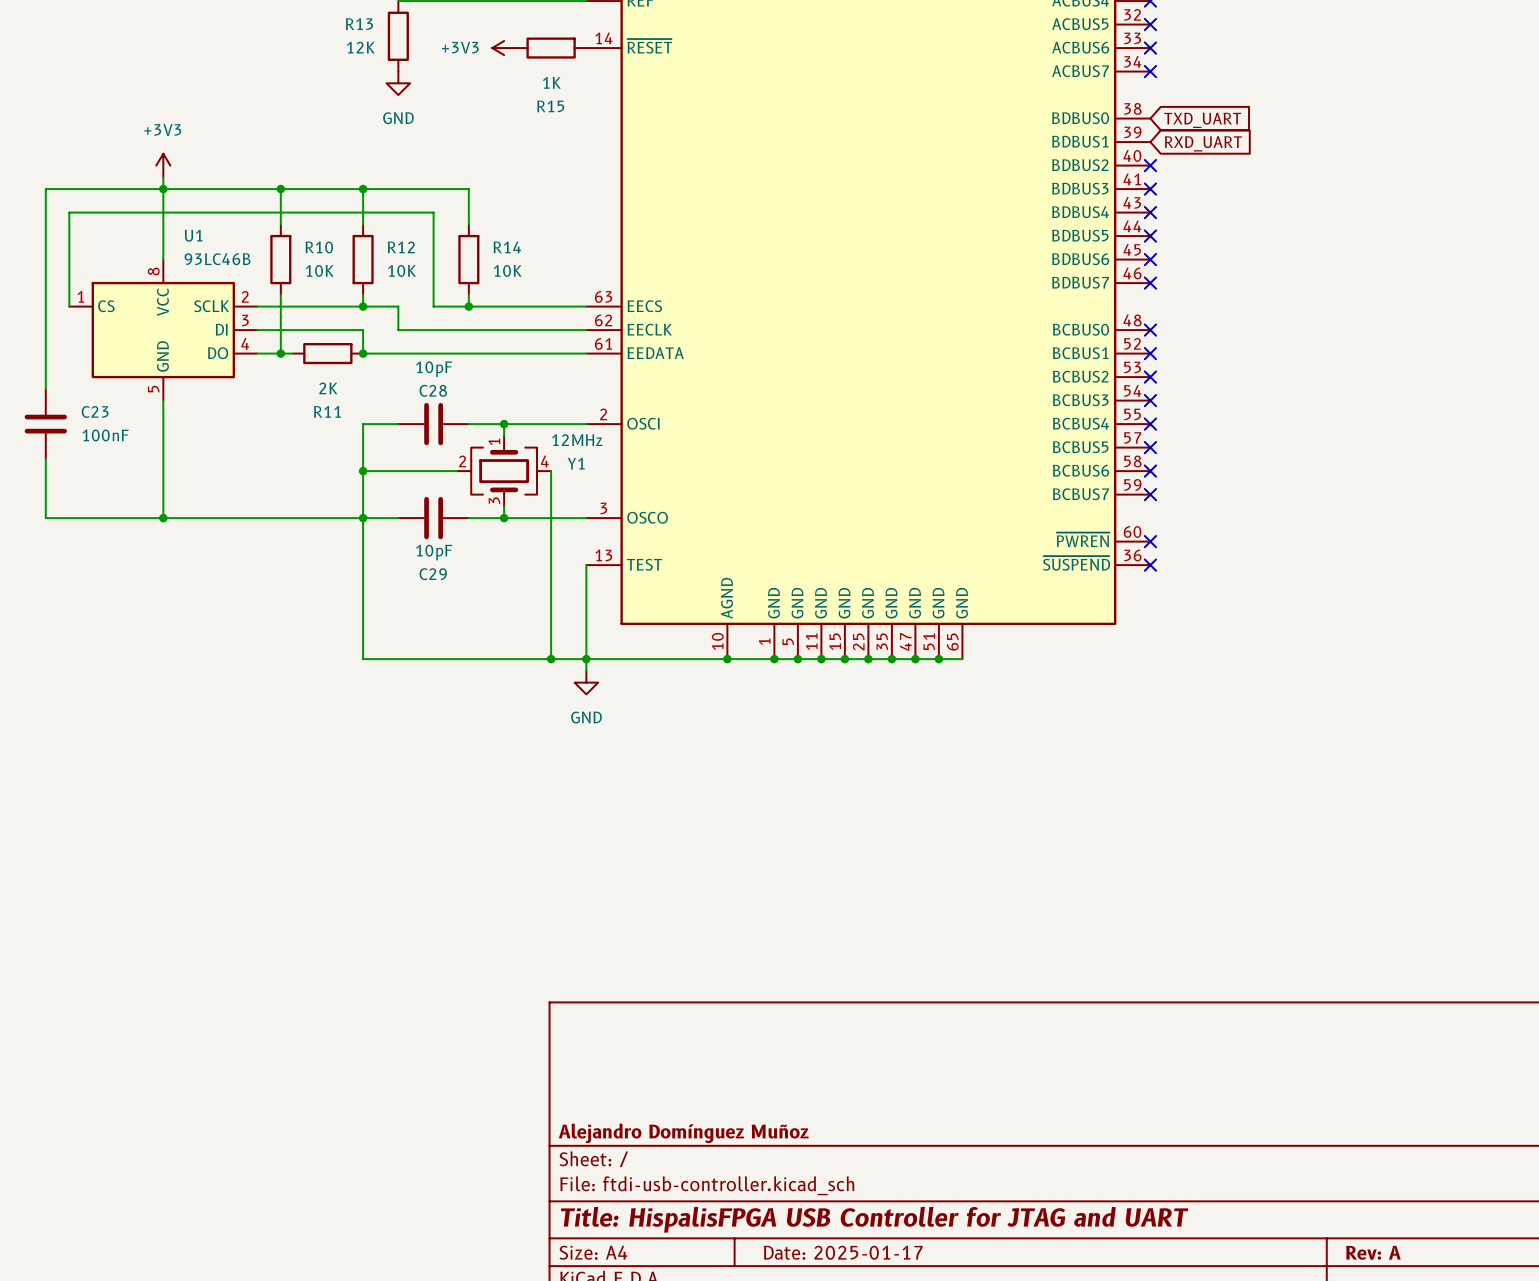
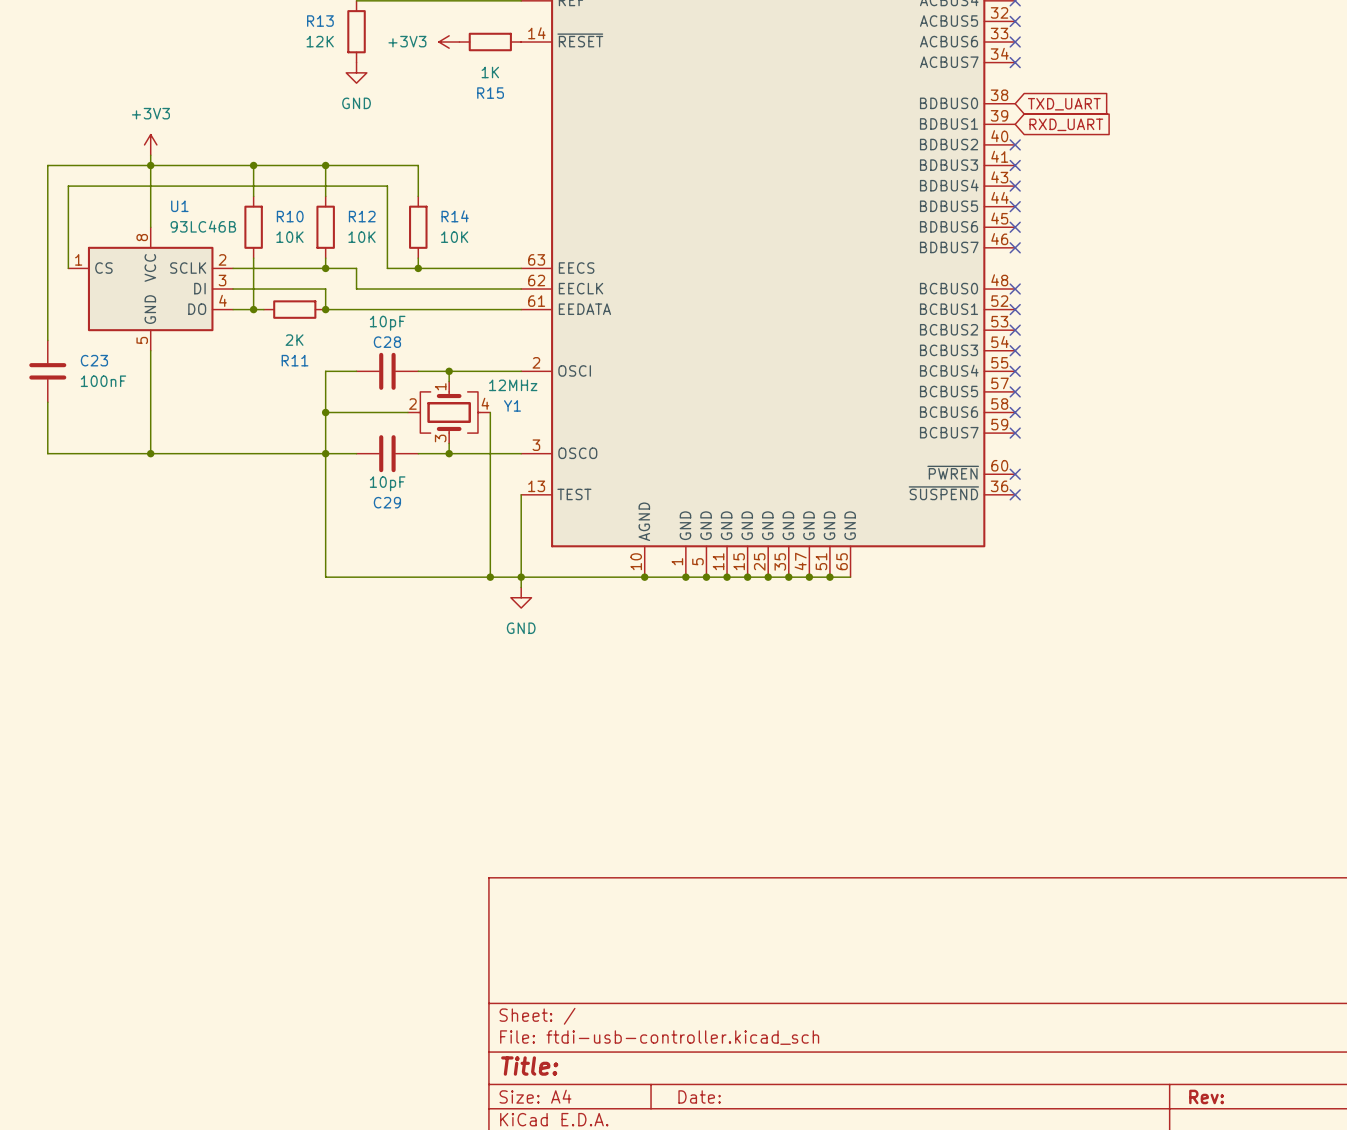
title block: Alejandro Domínguez Muñoz (683, 1133) -> none
title block: Title: HispalisFPGA USB Controller for JTAG and UART (874, 1219) -> Title: (529, 1066)
title block: Date: 2025-01-17 (843, 1252) -> Date: (699, 1096)
title block: Rev: A (1373, 1252) -> Rev: (1206, 1096)

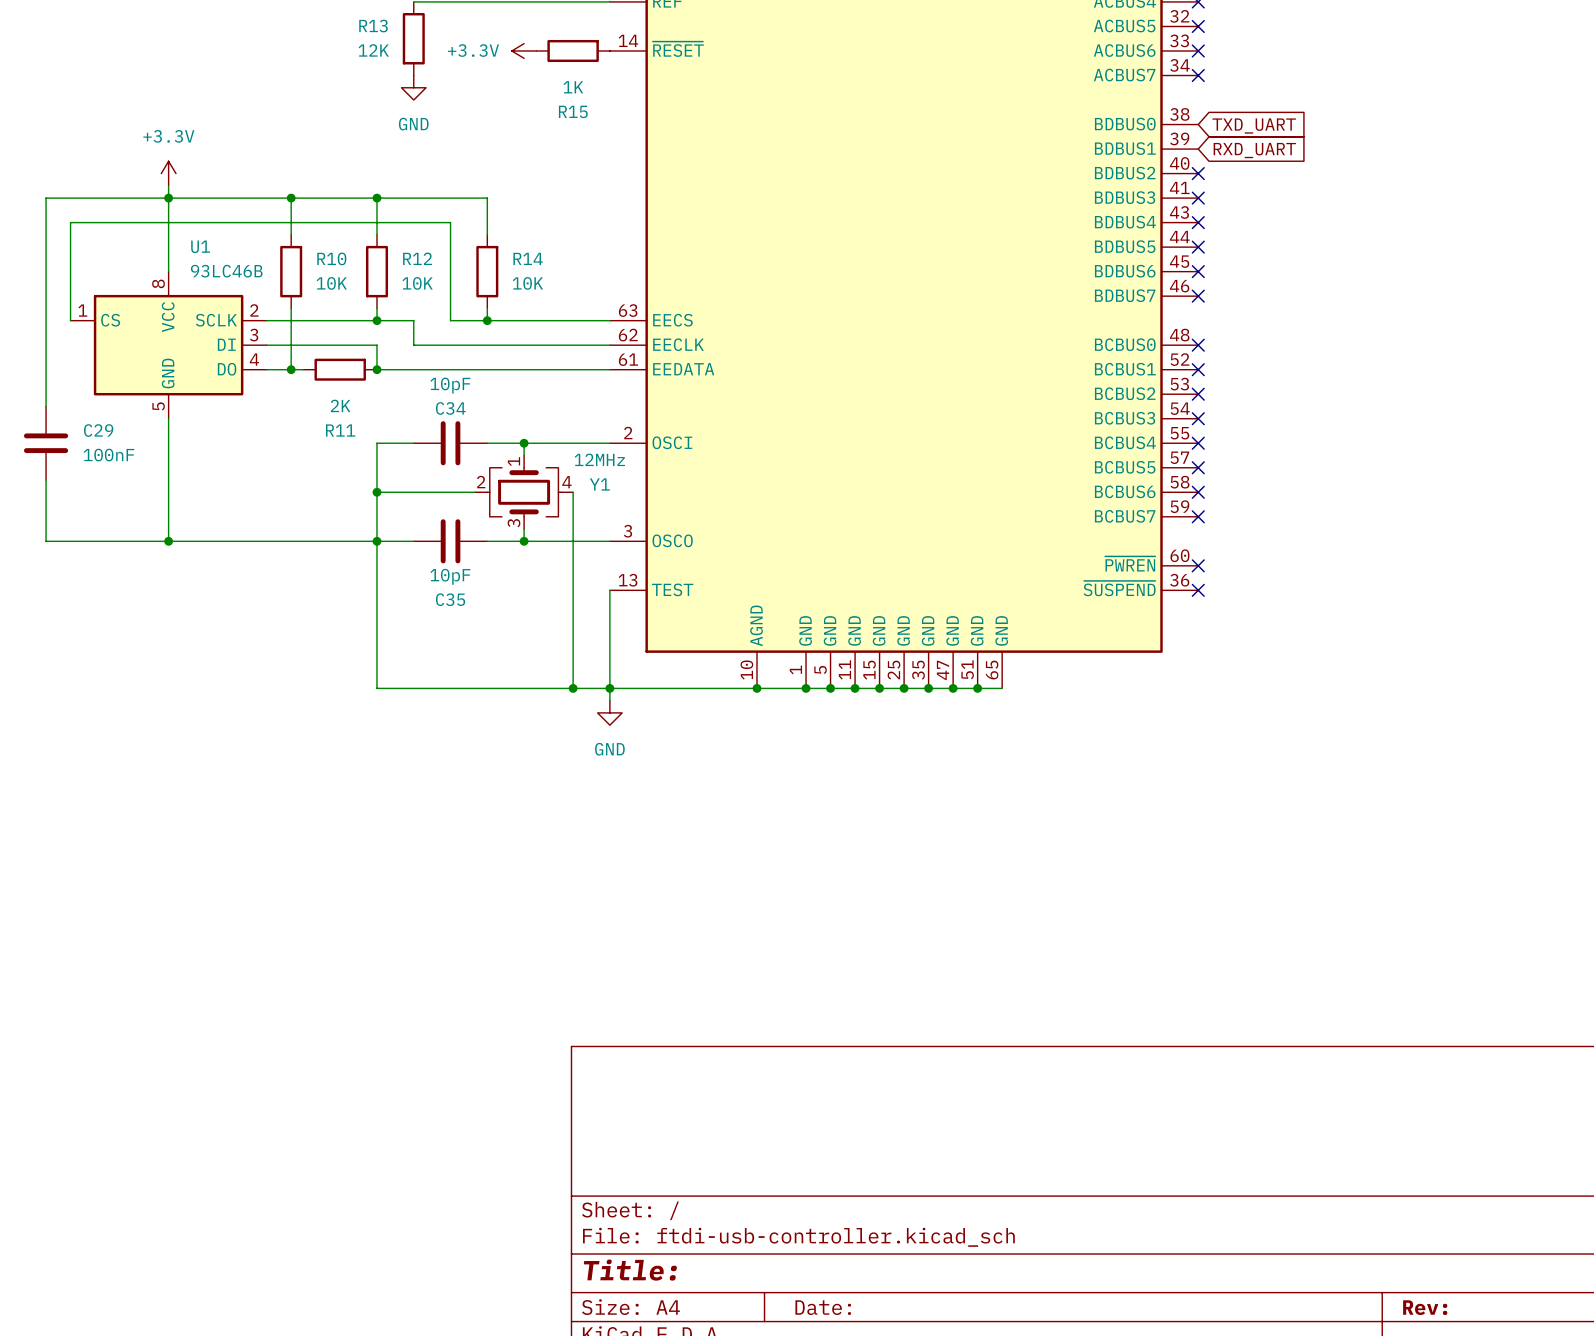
power symbol: +3V3 (449, 42) -> +3.3V (524, 50)
power symbol: +3V3 (150, 144) -> +3.3V (168, 173)
C28 name: C28 (387, 342) -> C34 (450, 408)
C23 name: C23 (94, 360) -> C29 (98, 430)
C29 name: C29 (387, 502) -> C35 (450, 599)

